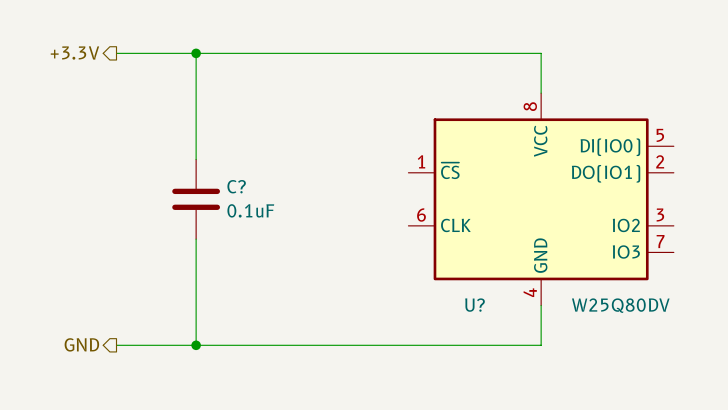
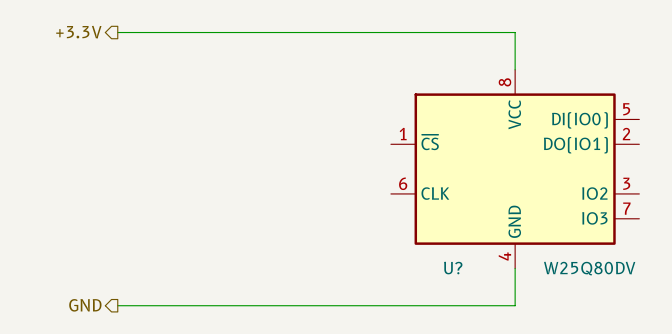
wire: (196, 53) (196, 159) -> none
junction: (196, 53) -> none
C?: 0.1uF (196, 199) -> none
wire: (196, 239) (196, 345) -> none
junction: (196, 345) -> none

